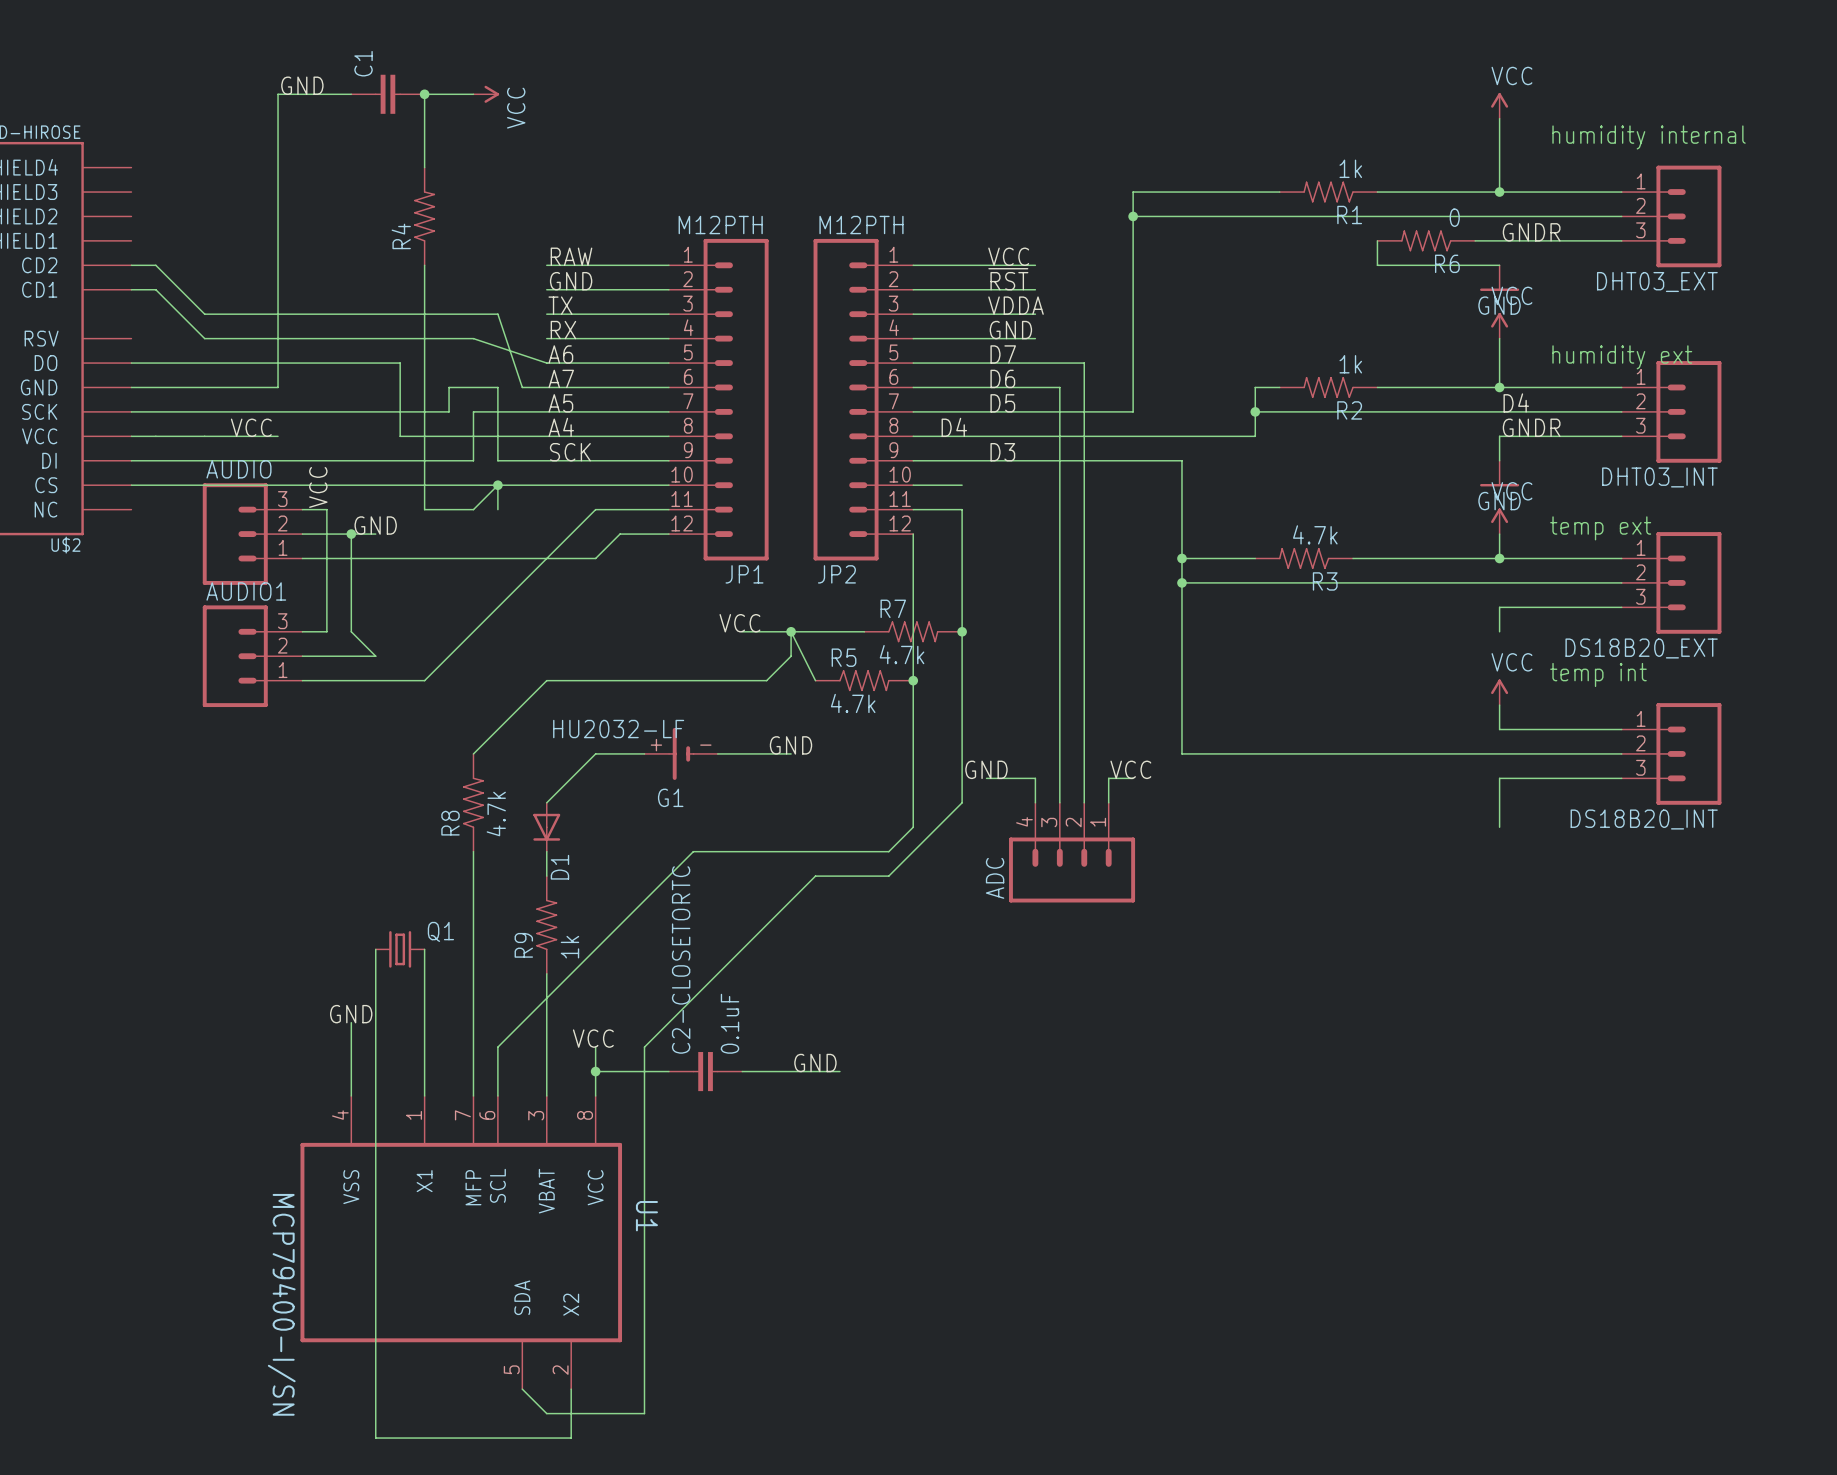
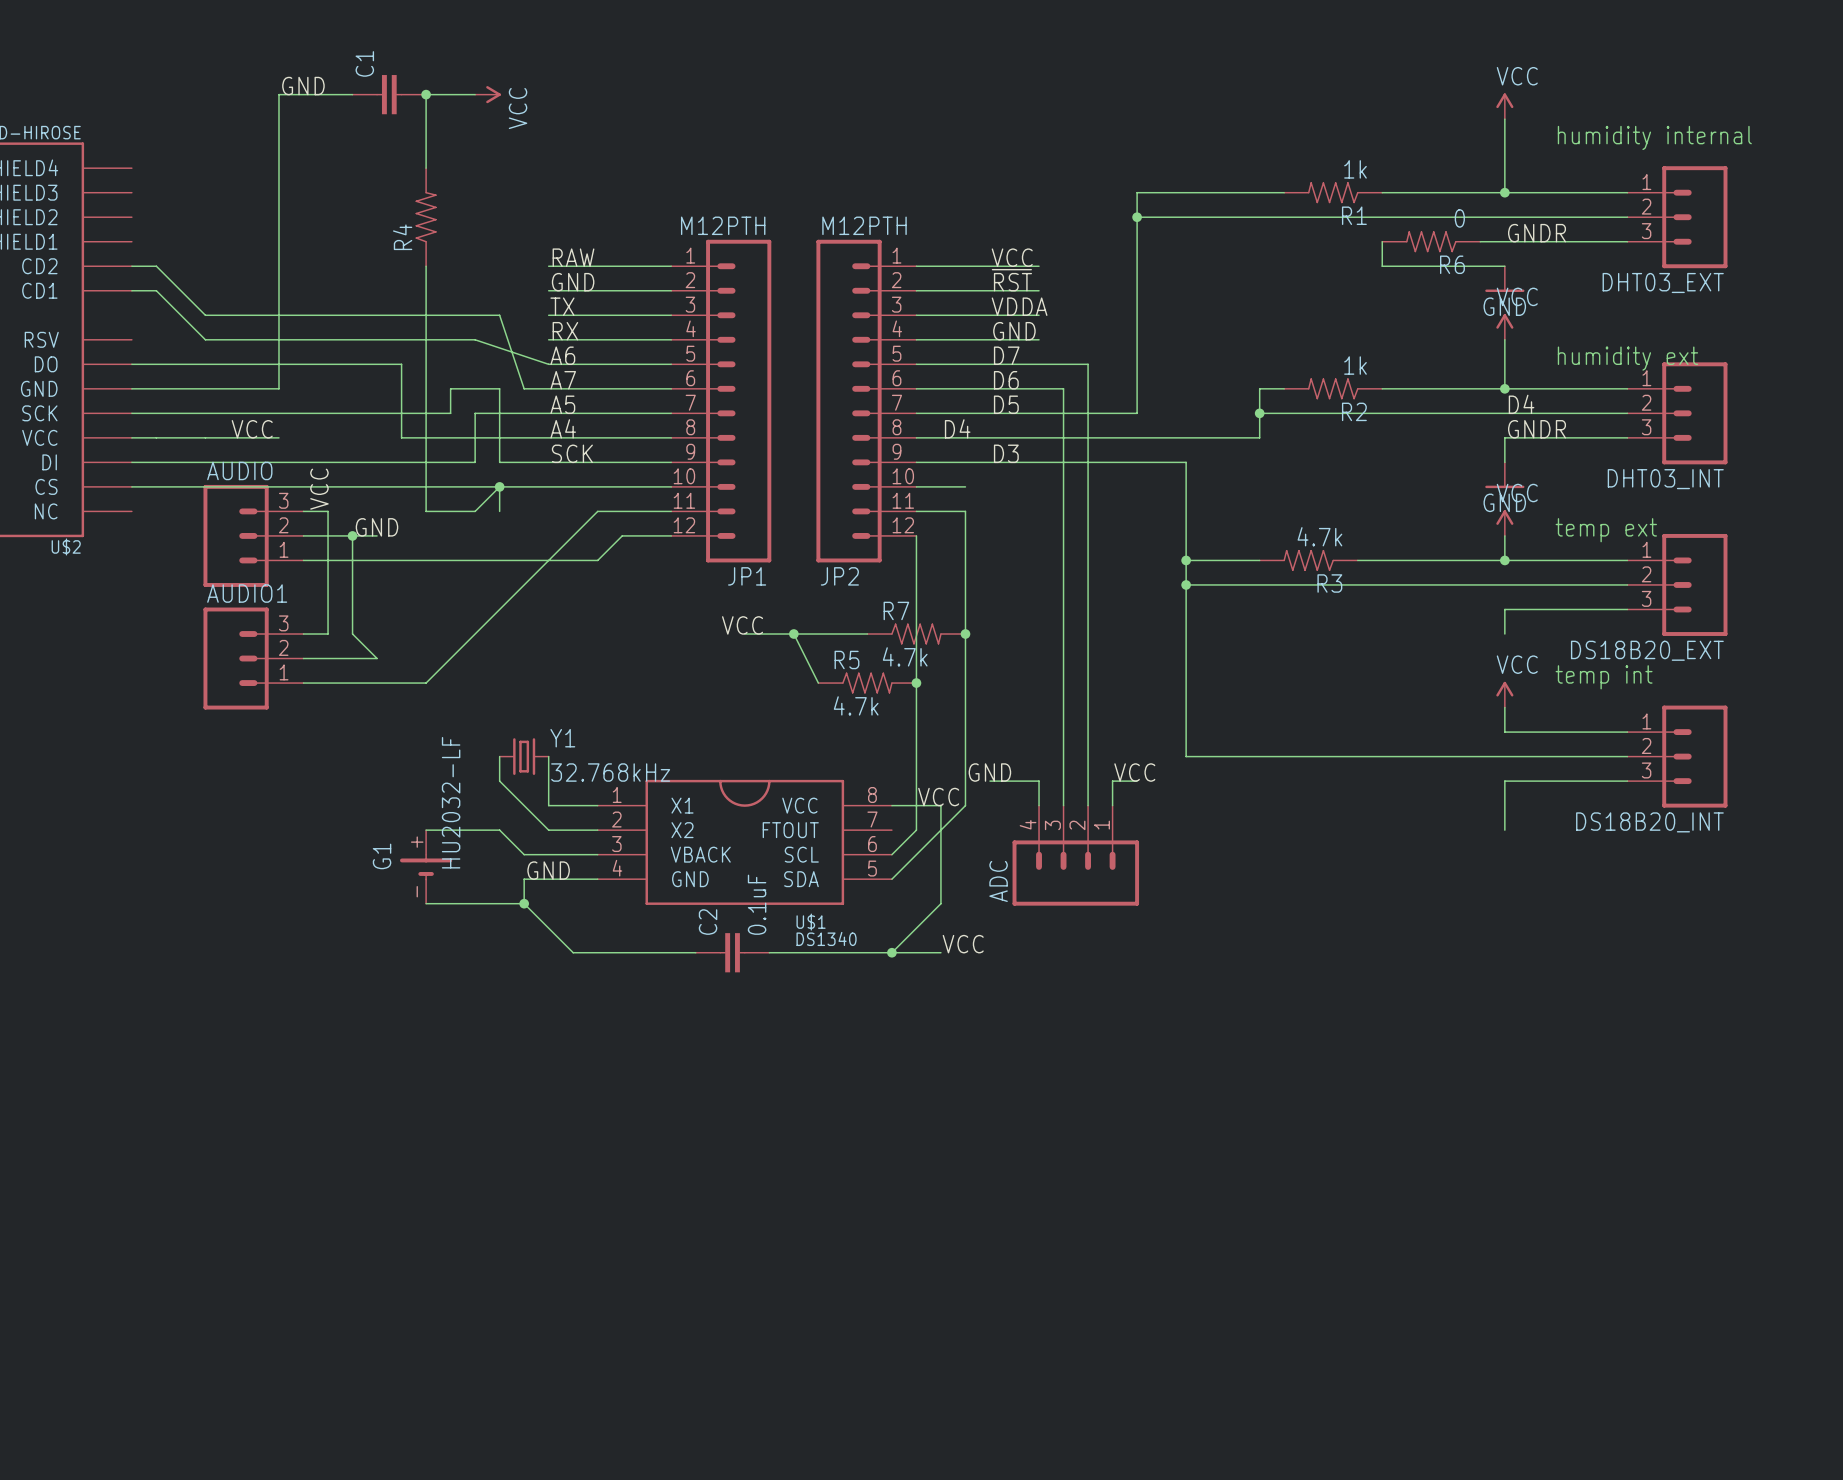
wire: (791, 631) (791, 656) (766, 680) (546, 680) (473, 753) -> none
label: GND (791, 745) -> none
wire: none -> (499, 756) (499, 781) (548, 830) (597, 830)
Y1: none -> 32.768kHz (524, 756)
wire: none -> (548, 756) (548, 805) (597, 805)
wire: (644, 753) (595, 753) (546, 802) -> none
G1 rotation: 0° (681, 753) -> 90° clockwise (426, 867)
G1 position: (681, 753) -> (426, 866)
wire: (717, 753) (791, 753) -> none
label: none -> VCC (938, 797)
R8: 4.7k (473, 802) -> none
wire: none -> (891, 805) (940, 805) (940, 903) (891, 952)
wire: none -> (426, 830) (499, 830) (524, 854) (597, 854)
D1: (546, 827) -> none
U$1: none -> DS1340 (744, 842)
wire: (473, 851) (473, 1095) -> none
wire: (546, 851) (546, 876) -> none
wire: (888, 851) (693, 851) (497, 1047) (497, 1095) -> none
label: none -> GND (548, 870)
wire: none -> (597, 879) (524, 879) (524, 903)
wire: (888, 876) (815, 876) (644, 1047) (644, 1413) (546, 1413) (522, 1389) -> none
wire: none -> (426, 903) (524, 903)
wire: none -> (524, 903) (573, 952) (695, 952)
junction: none -> (524, 903)
R9: 1k (546, 924) -> none
label: none -> VCC (963, 944)
wire: (375, 949) (375, 1438) (571, 1438) (571, 1389) -> none
Q1: (400, 949) -> none
wire: (424, 949) (424, 1095) -> none
C2: none -> 0.1uF (732, 952)
wire: none -> (769, 952) (940, 952)
junction: none -> (891, 952)
wire: (546, 973) (546, 1095) -> none
label: GND (351, 1014) -> none
wire: (351, 1022) (351, 1095) -> none
label: VCC (593, 1038) -> none
wire: (595, 1047) (595, 1095) -> none
label: GND (815, 1063) -> none
wire: (595, 1071) (668, 1071) -> none
junction: (595, 1071) -> none
C2-CLOSETORTC: 0.1uF (705, 1071) -> none
wire: (742, 1071) (839, 1071) -> none
U1: MCP79400-I/SN (461, 1242) -> none

